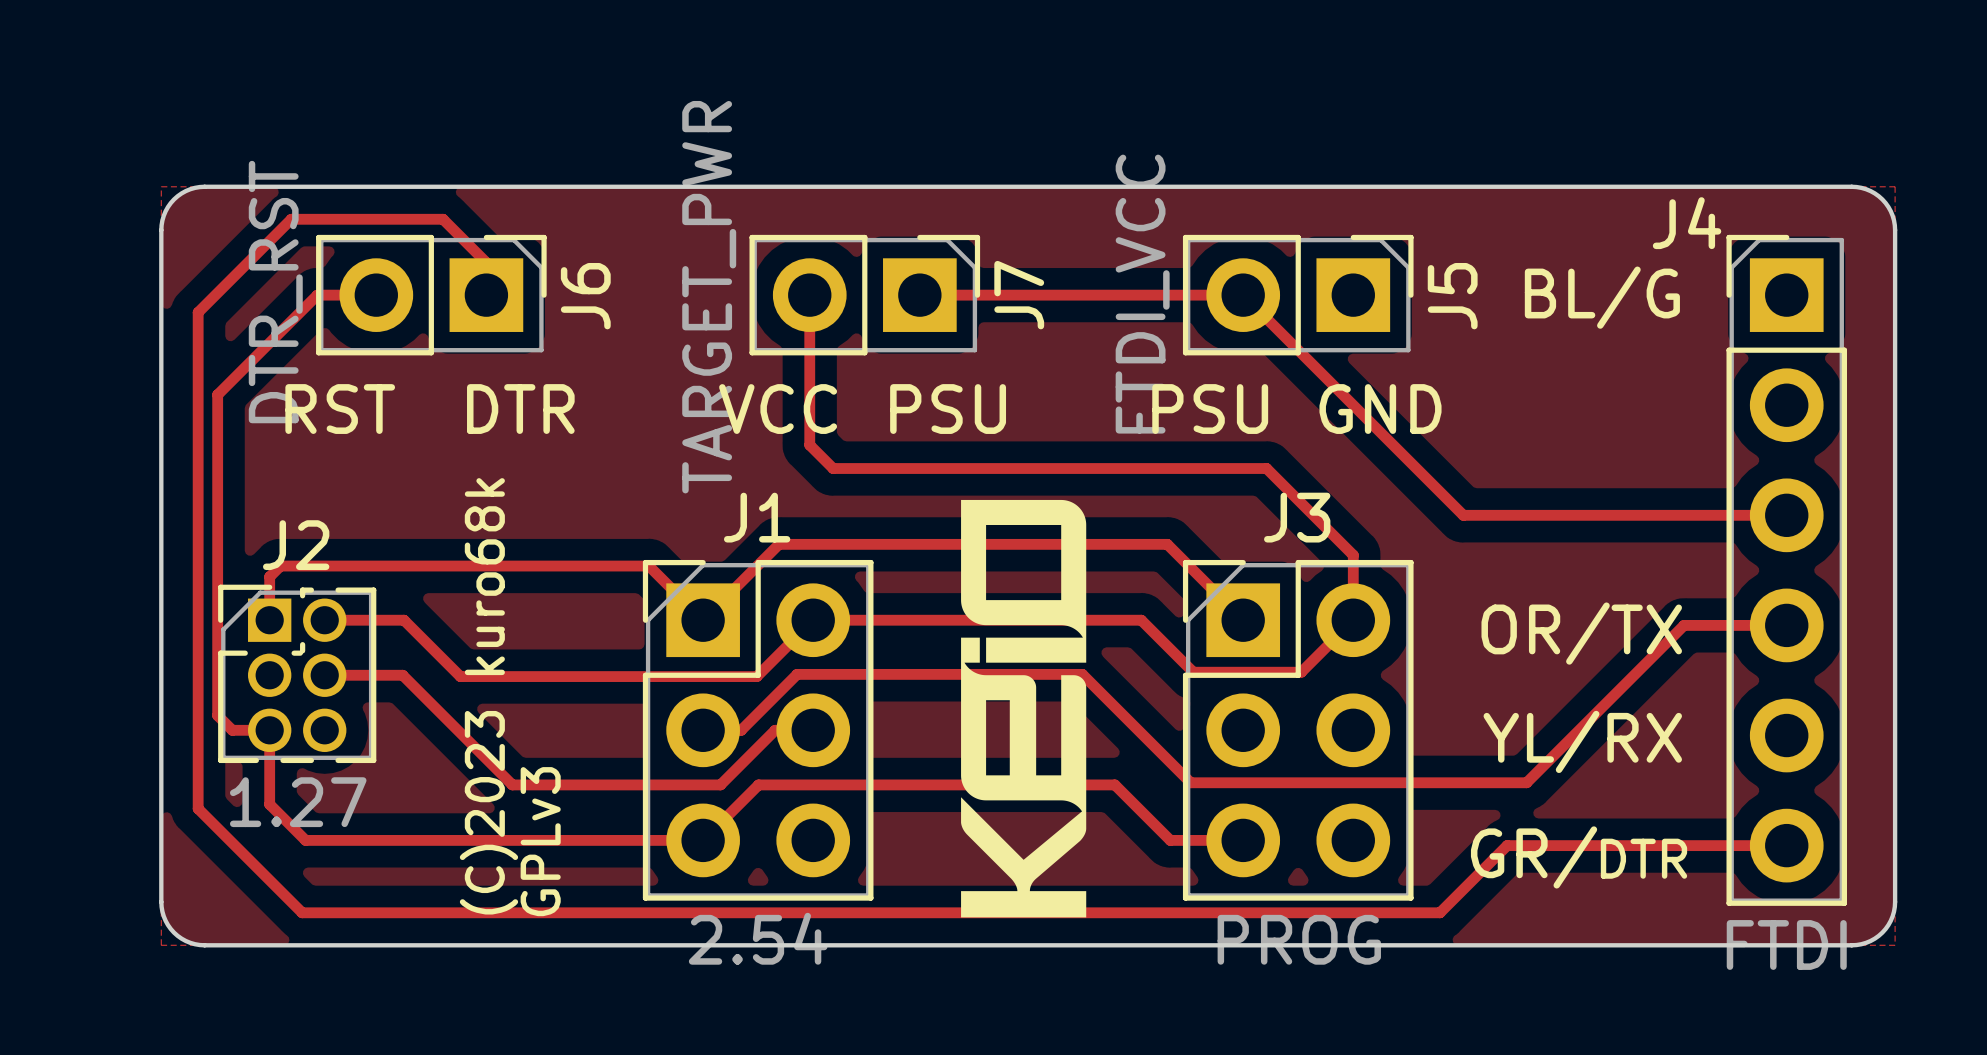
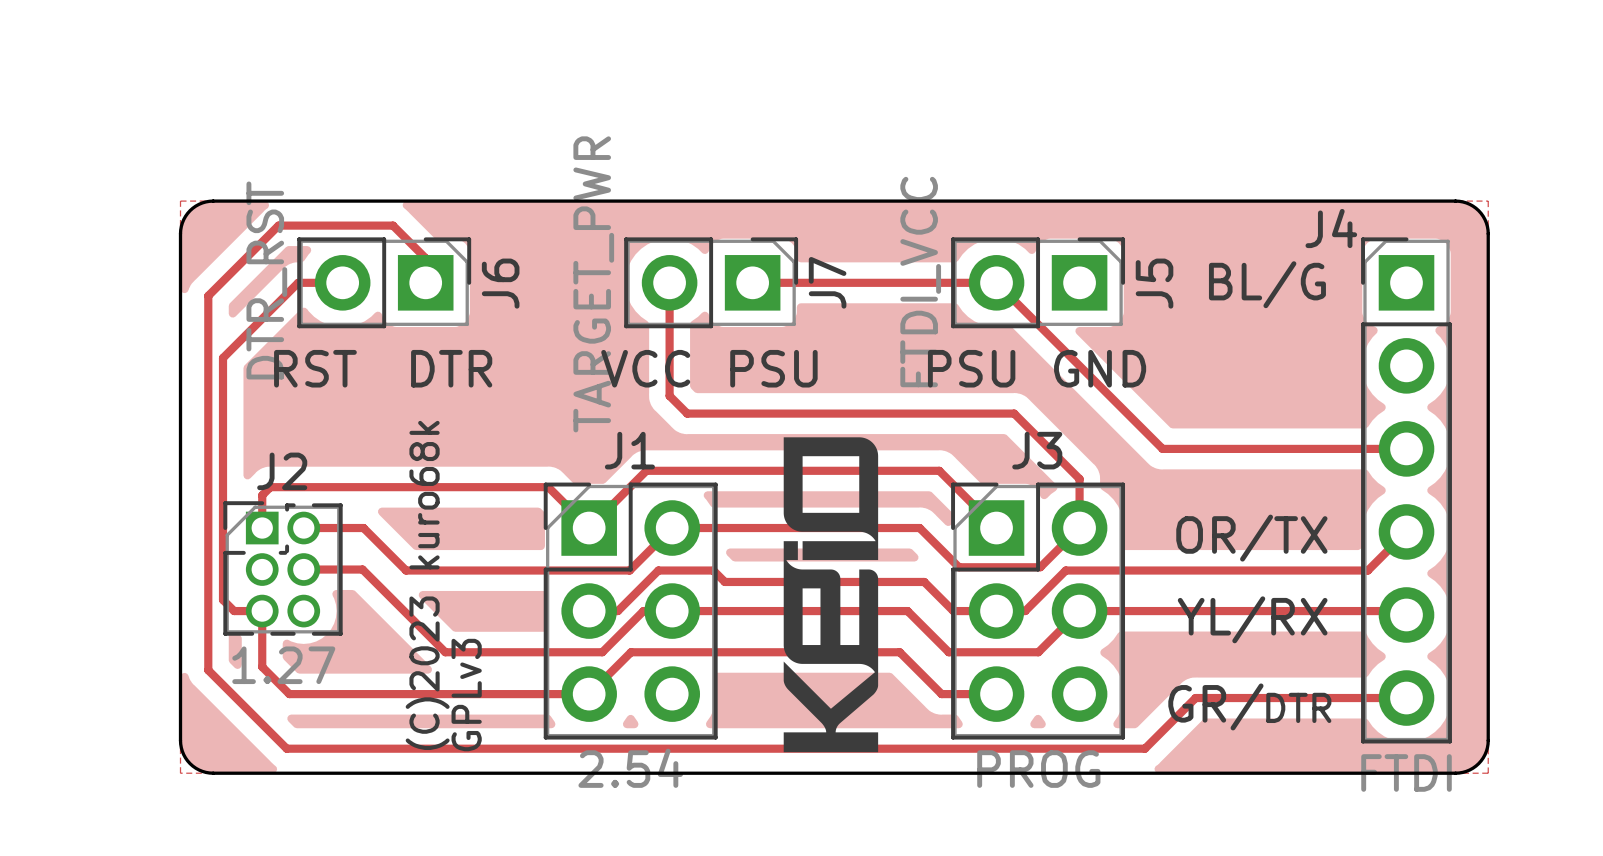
track: (1786, 625) (1684, 625) (1526, 782) (1190, 782) (1082, 674) (797, 674) (794, 676) -> (1406, 531) (1367, 570) (1065, 570) (1025, 611) (953, 611) (924, 581) (724, 581) (713, 570) (658, 570)
track: none -> (672, 611) (907, 611) (948, 652) (1038, 652) (1079, 611) (1402, 611) (1406, 614)

